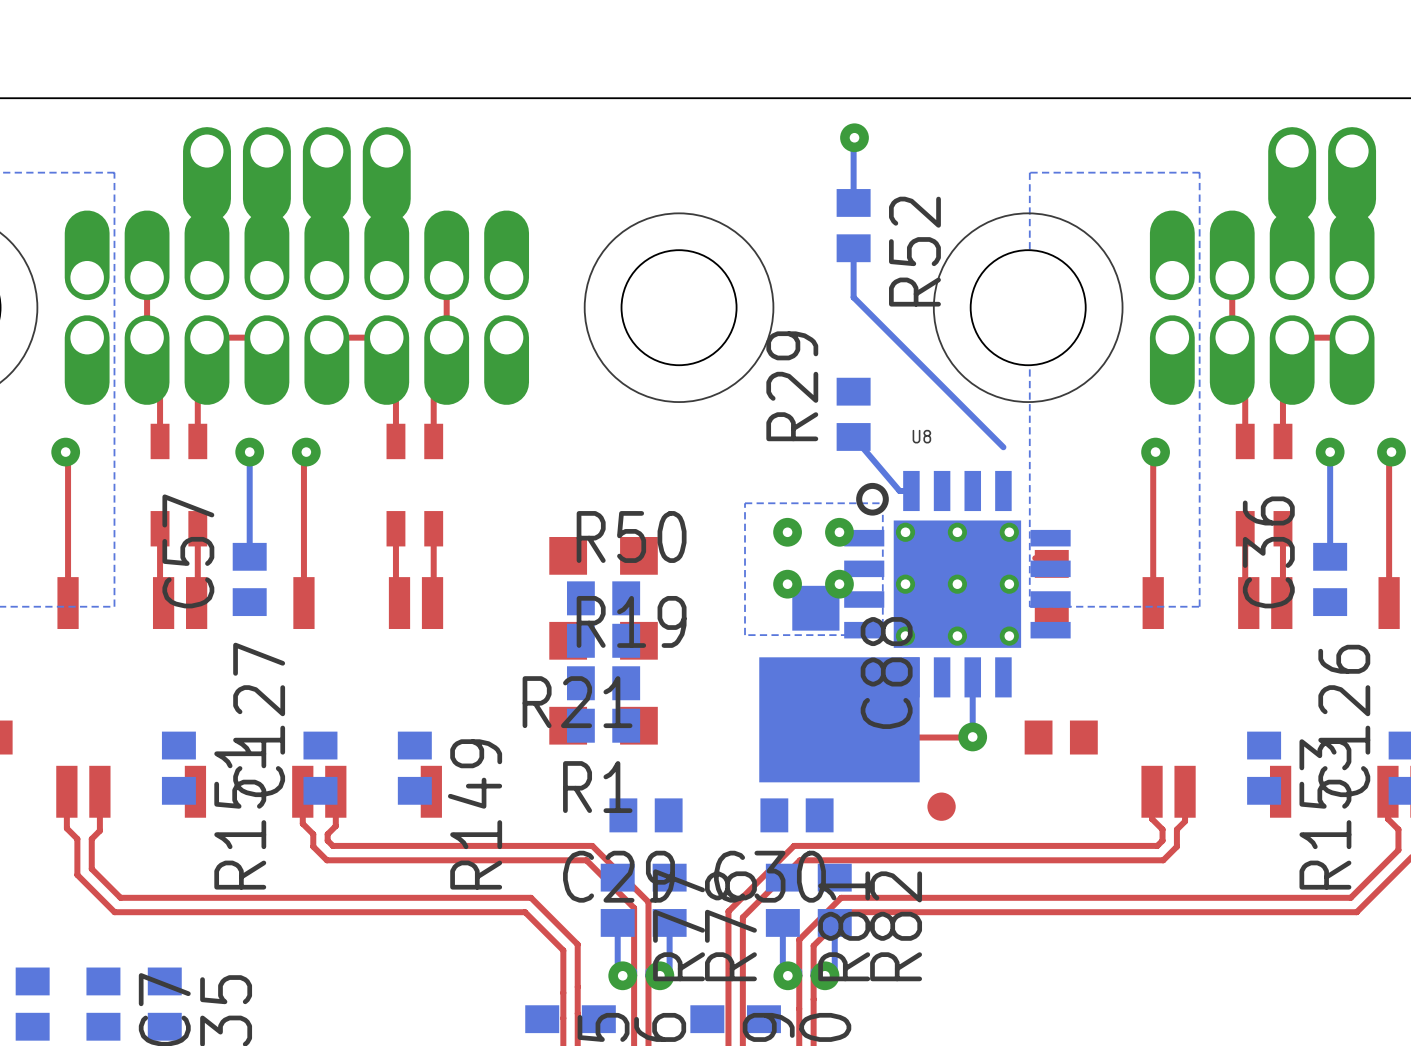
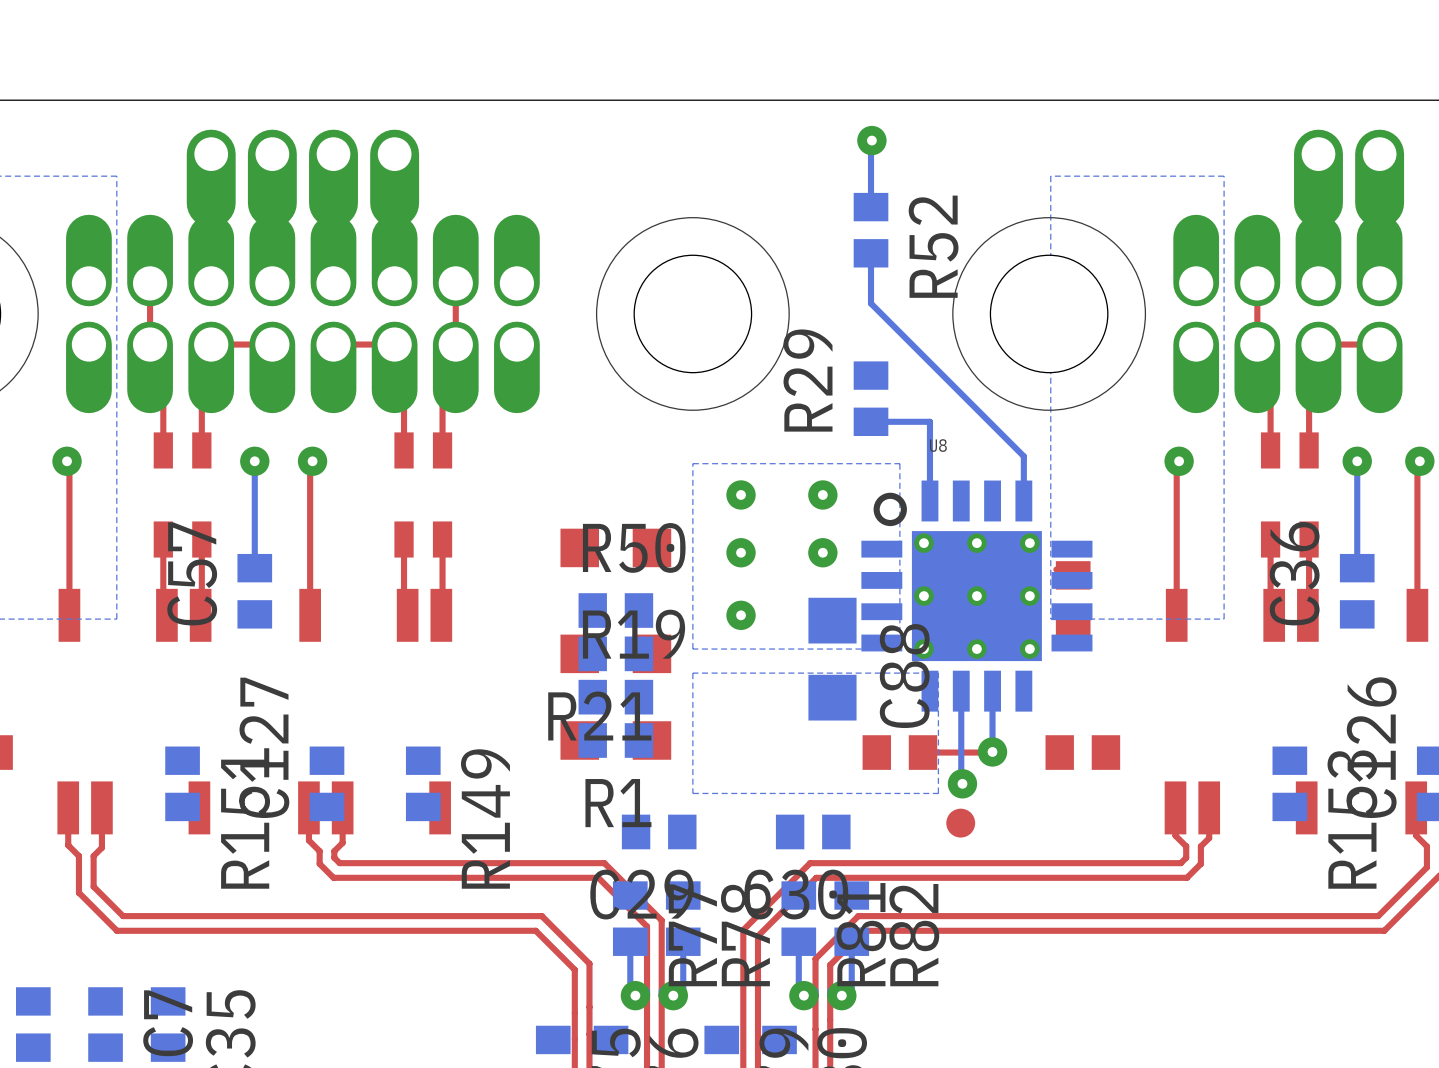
R29 position: (853, 414) -> (871, 398)
bottom track: (853, 436) (899, 490) (911, 490) -> (871, 421) (929, 421) (929, 500)
bottom track: none -> (1023, 456) (1023, 500)
bottom zone outline: none -> (899, 463) (692, 463) (692, 649) (899, 649) (899, 463)
via: none -> (741, 494)
via: none -> (822, 494)
bottom zone outline: (882, 503) (882, 635) (745, 635) (745, 503) (882, 503) -> none
via position: (787, 532) -> (822, 552)
via: (839, 532) -> none
via: none -> (741, 552)
part position: (603, 555) -> (615, 547)
via: (787, 584) -> none
via: (839, 584) -> none
via: none -> (741, 615)
drawing: [759, 657, 920, 783] -> none
bottom zone outline: none -> (938, 673) (692, 673) (692, 793) (938, 793) (938, 673)
bottom track: none -> (961, 691) (962, 783)
via: none -> (962, 783)

